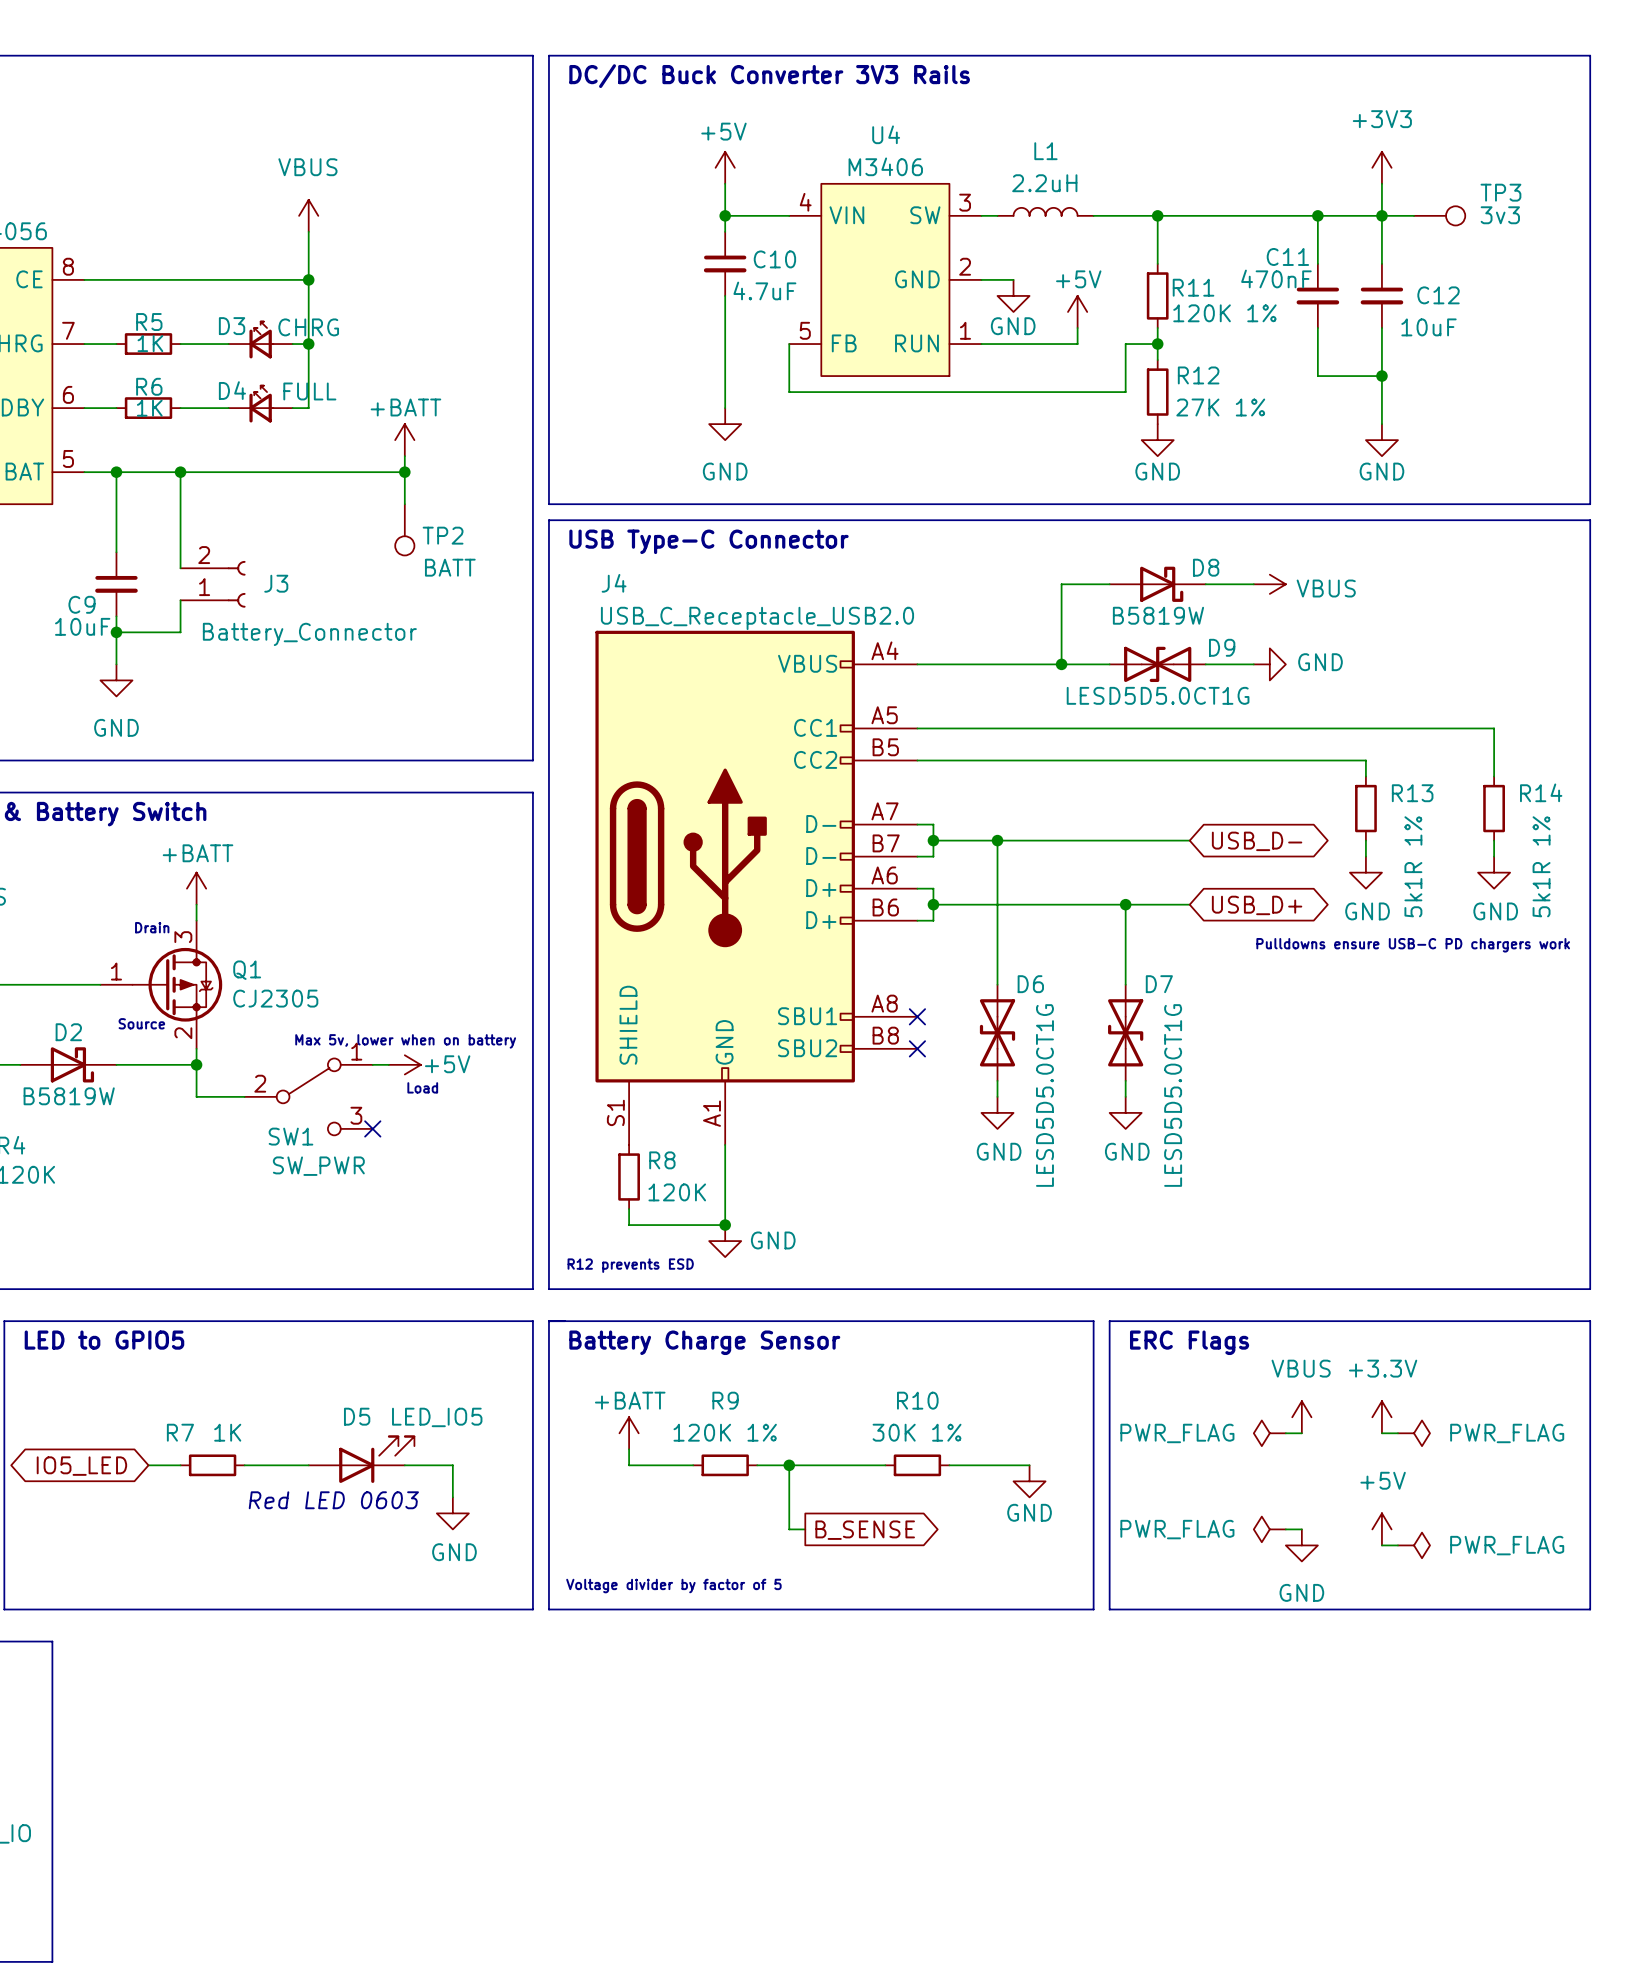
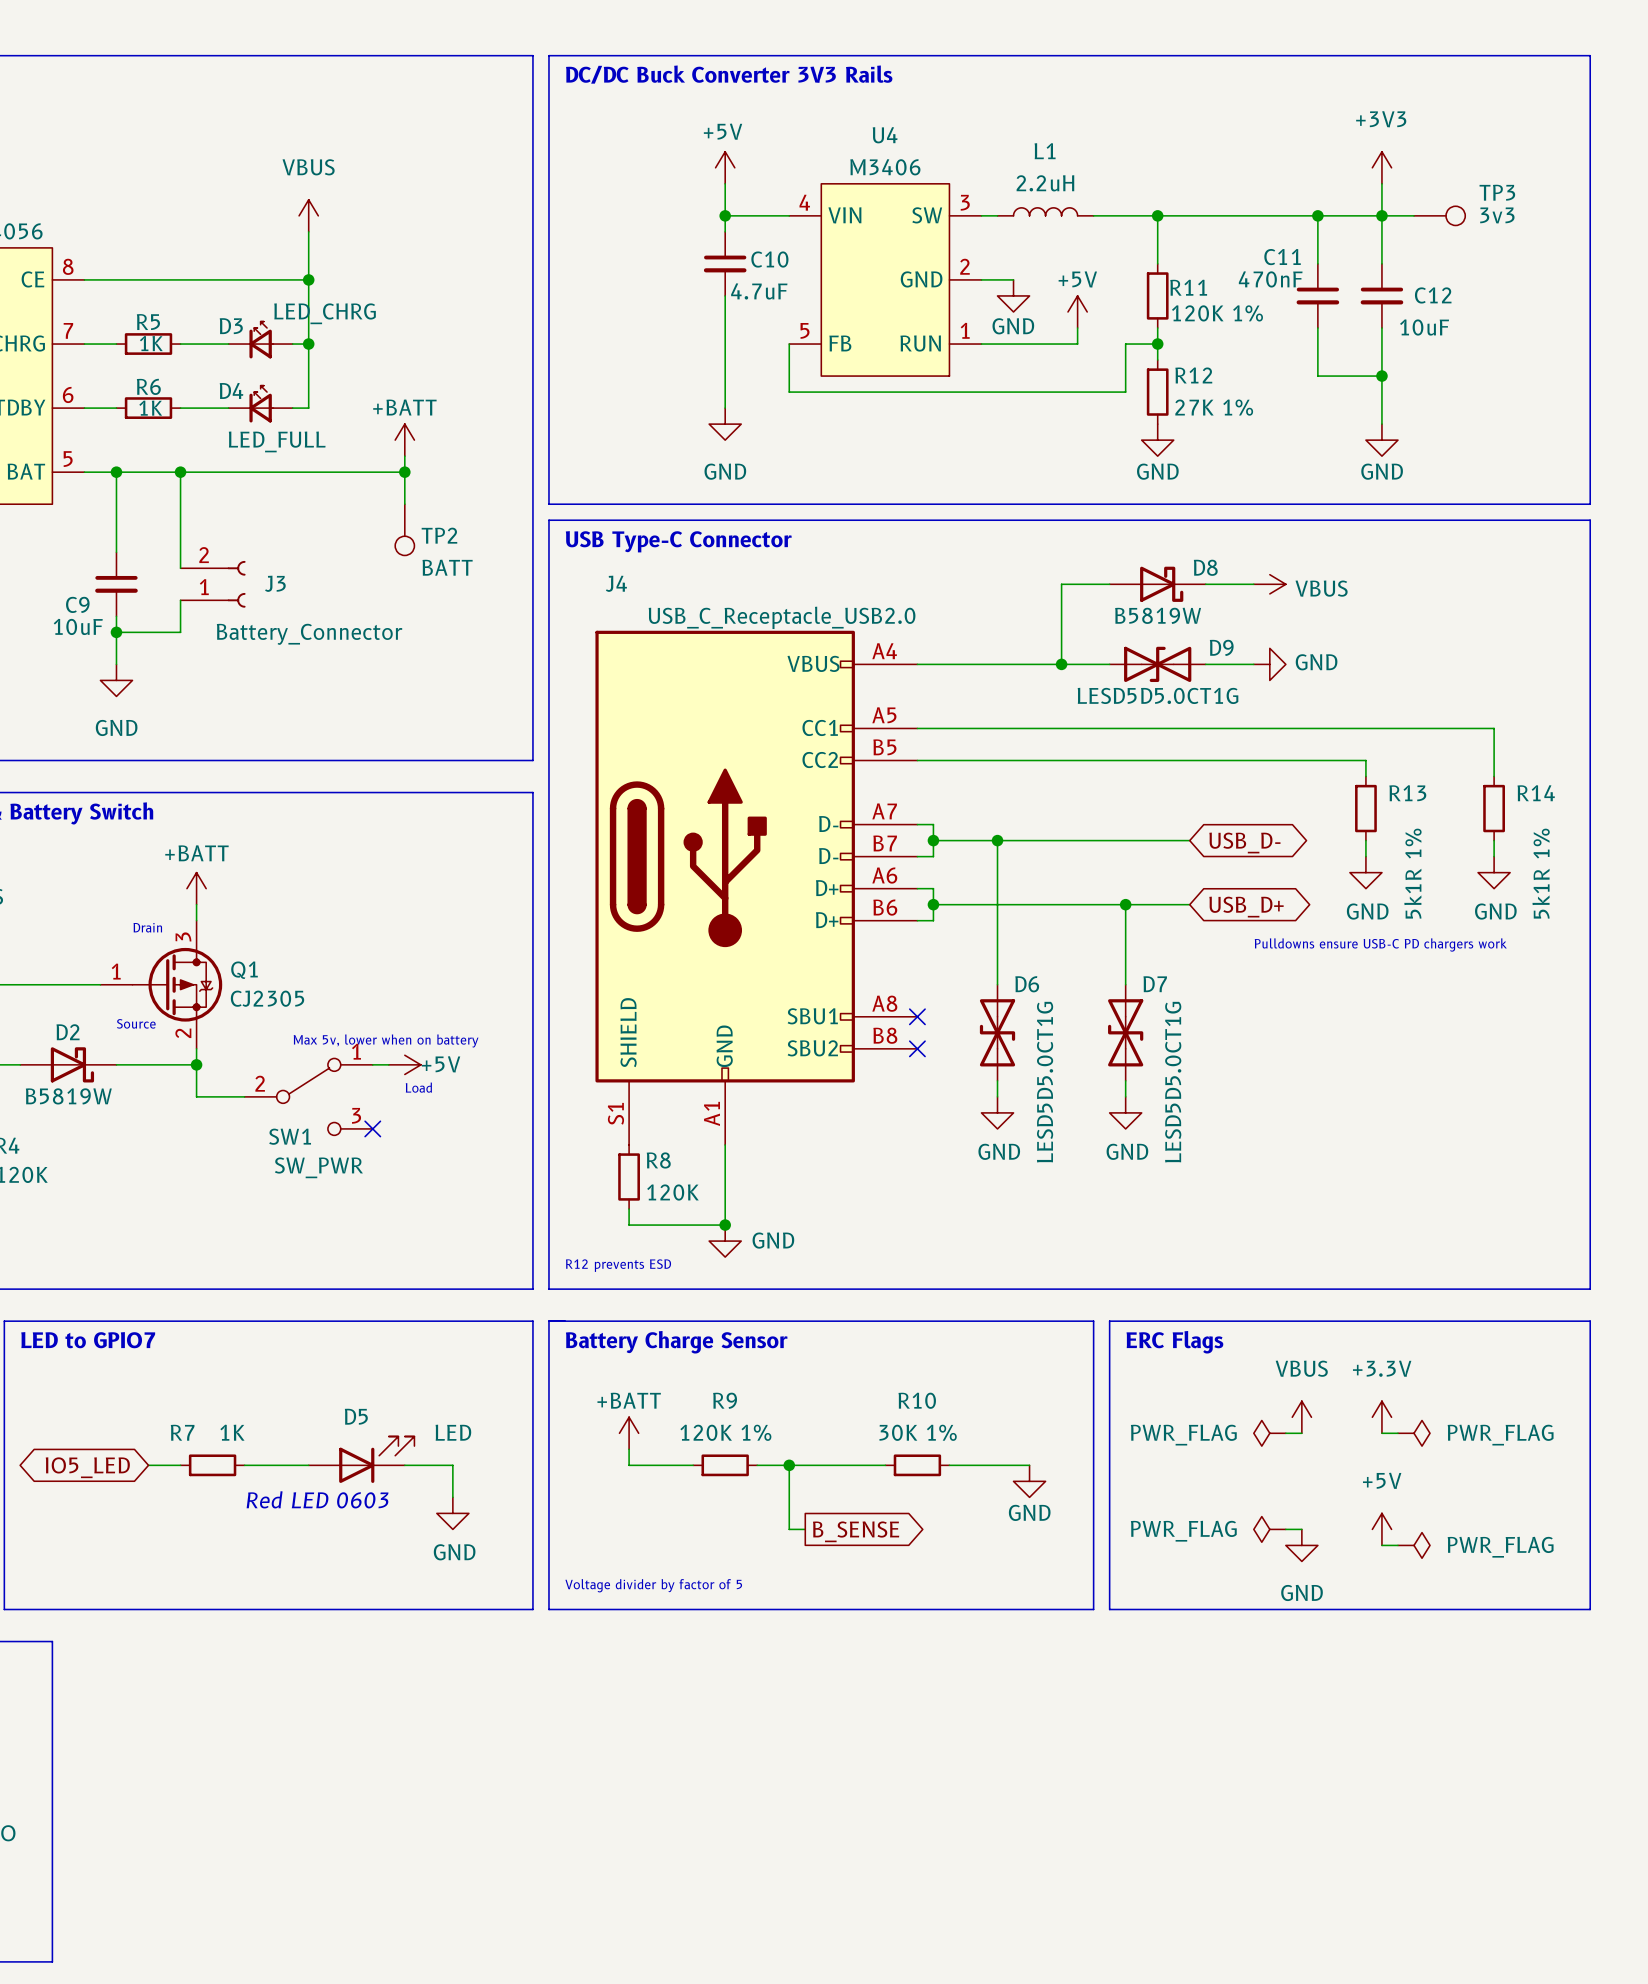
D3 value: CHRG (308, 327) -> LED_CHRG (325, 313)
D4 value: FULL (309, 391) -> LED_FULL (277, 441)
text: LED to GPIO5 (104, 1340) -> LED to GPIO7 (88, 1340)
D5 value: LED_IO5 (437, 1417) -> LED (453, 1432)

